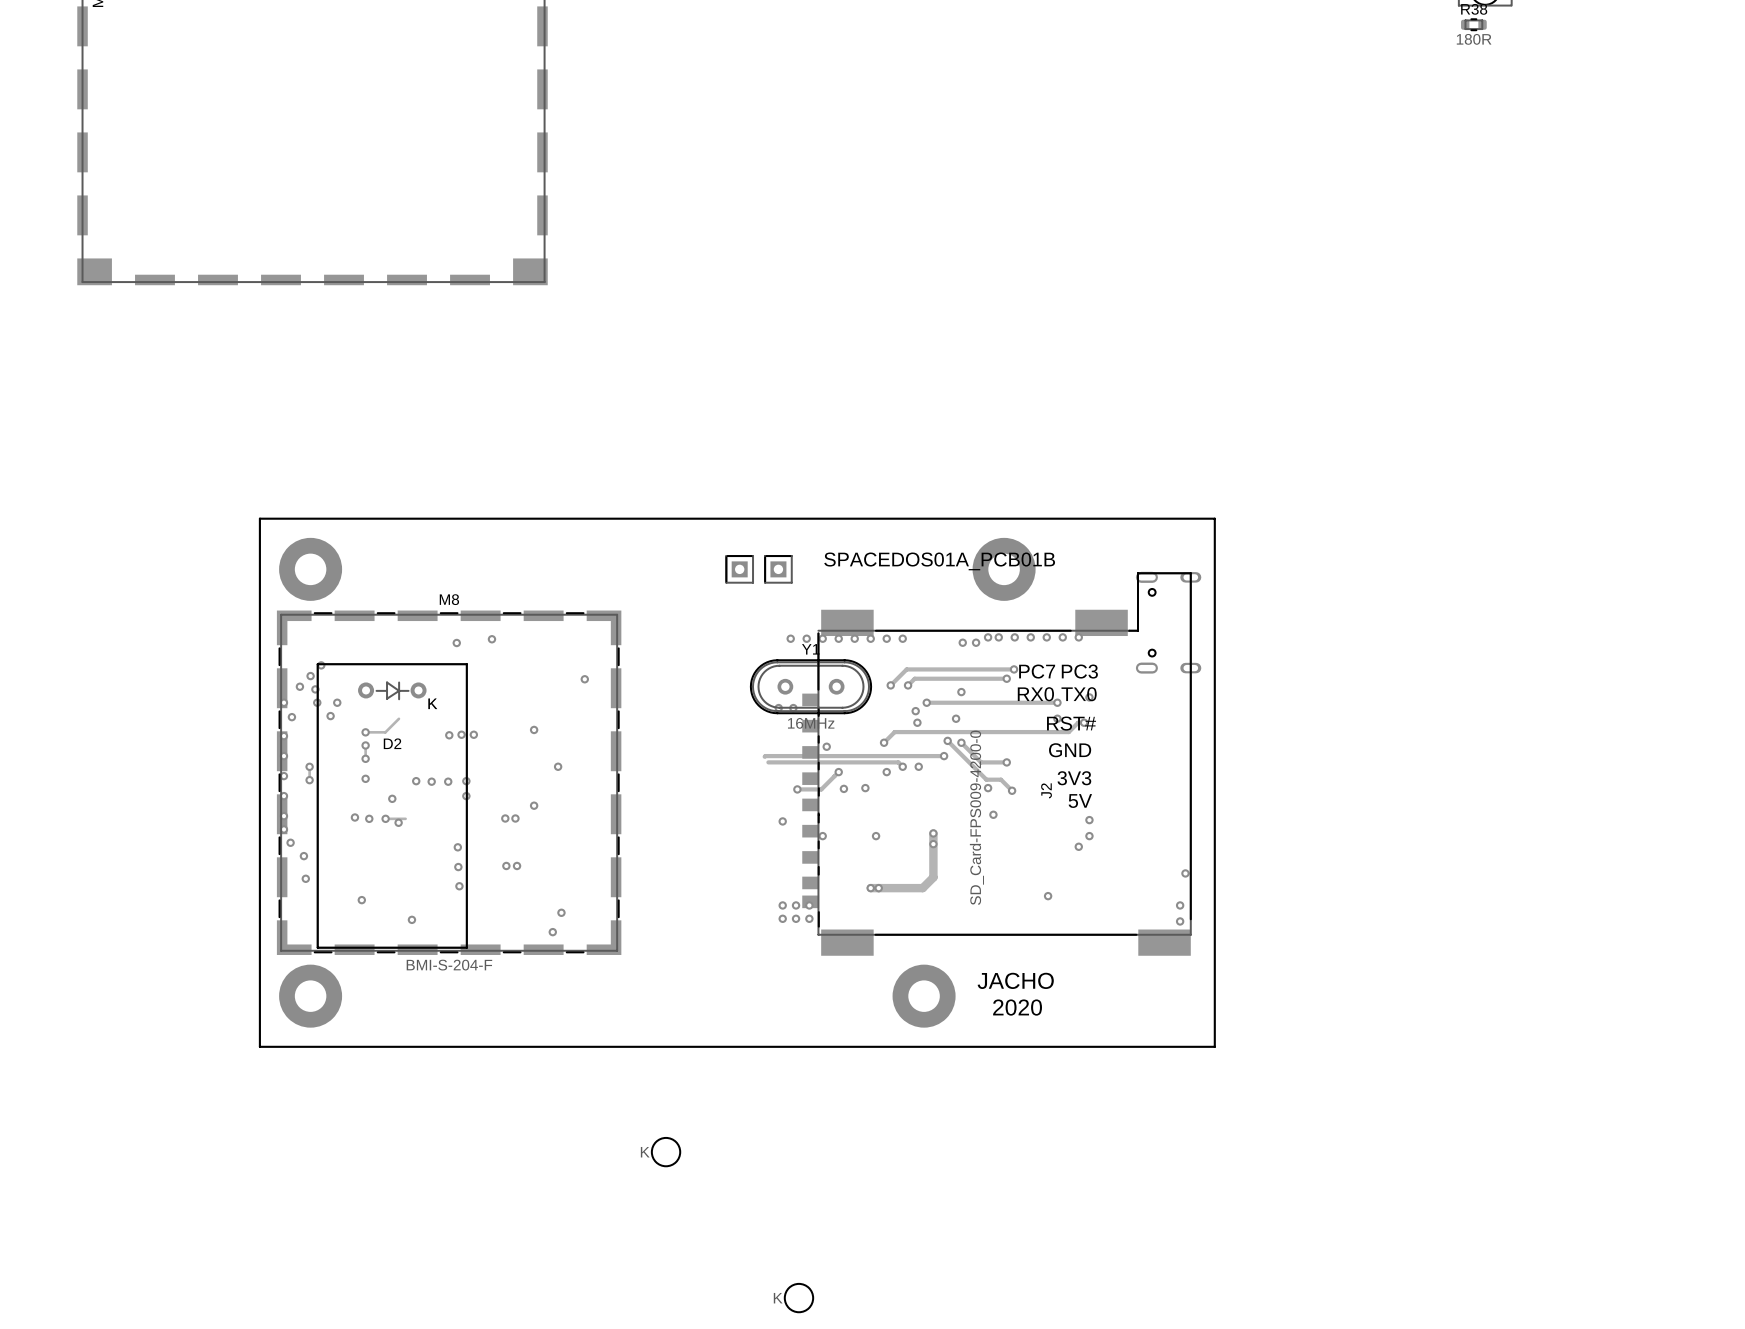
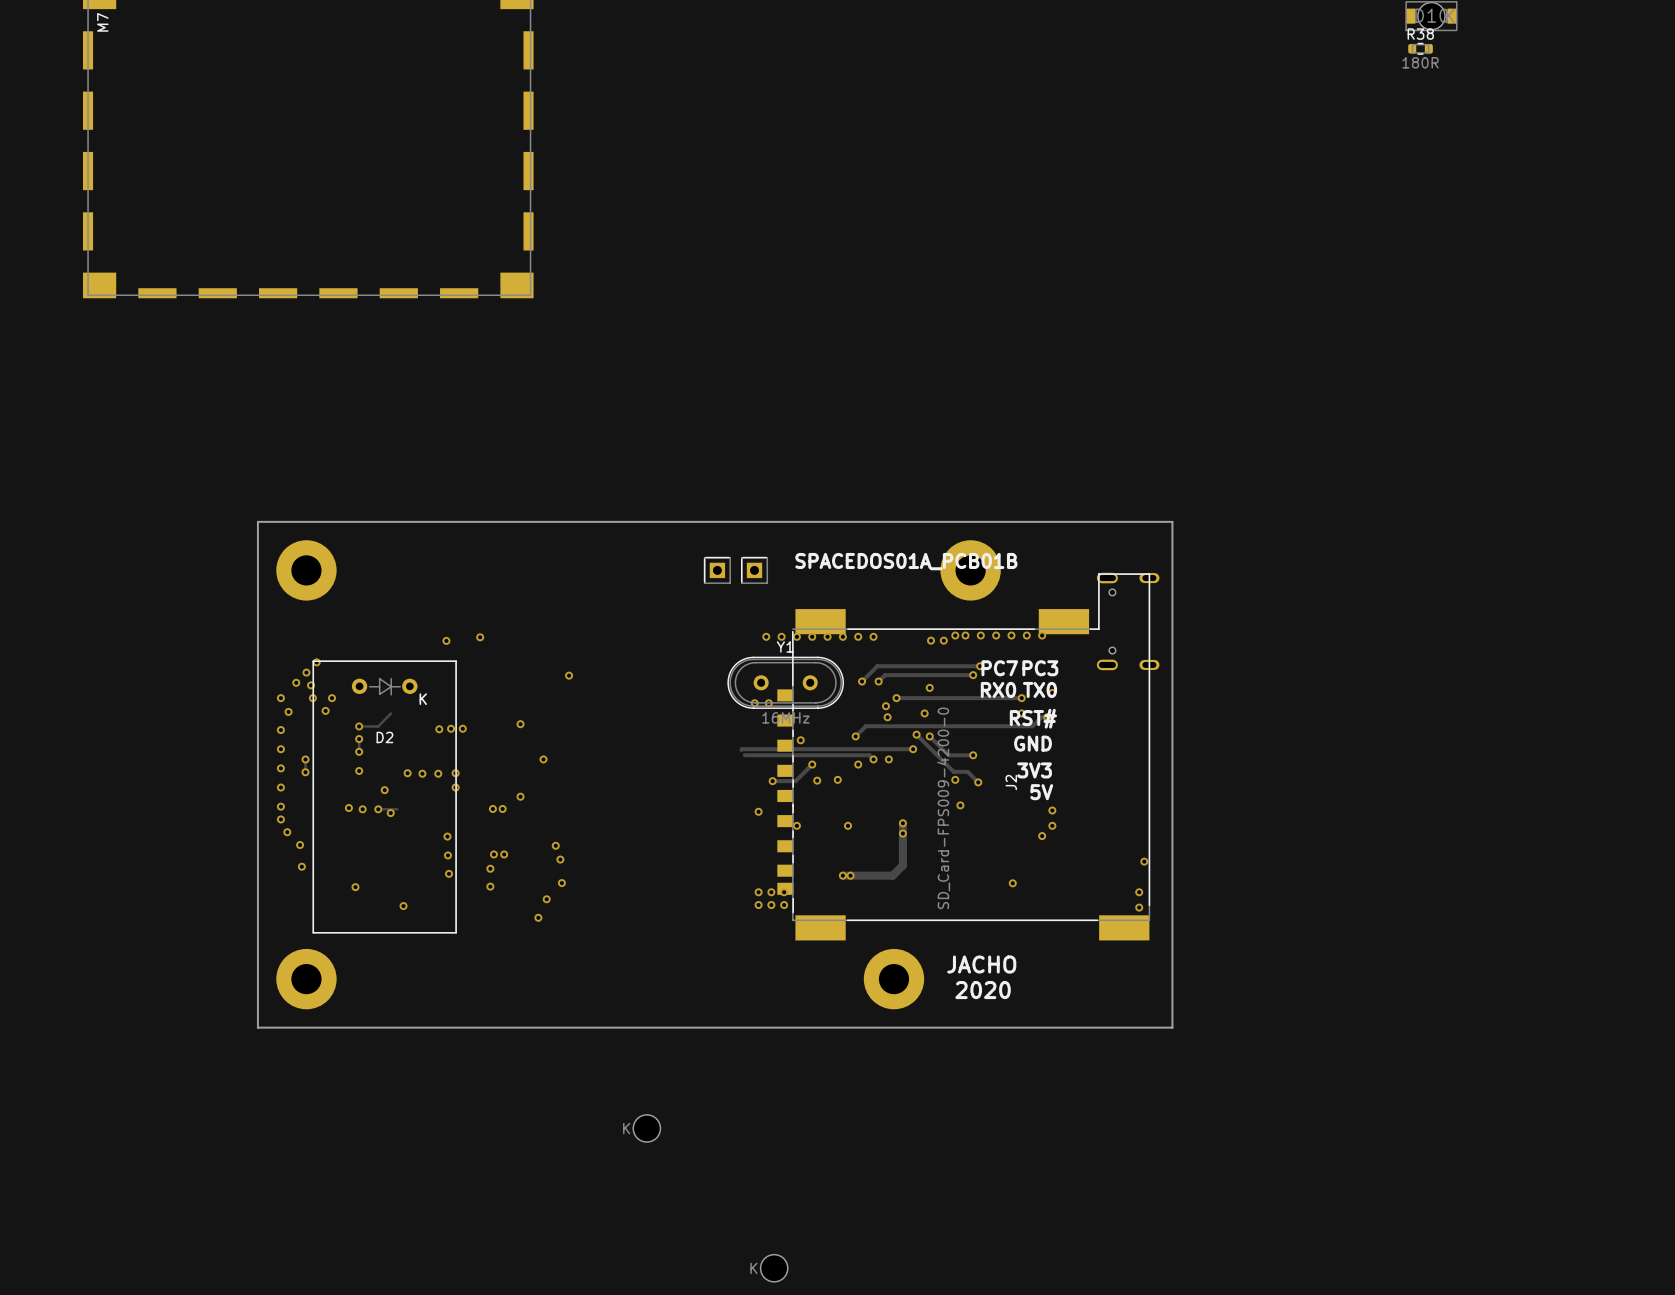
M8: BMI-S-204-F (449, 782) -> none
via: none -> (555, 845)
via: none -> (560, 859)
via: none -> (490, 868)
via: none -> (561, 883)
via: none -> (490, 886)

